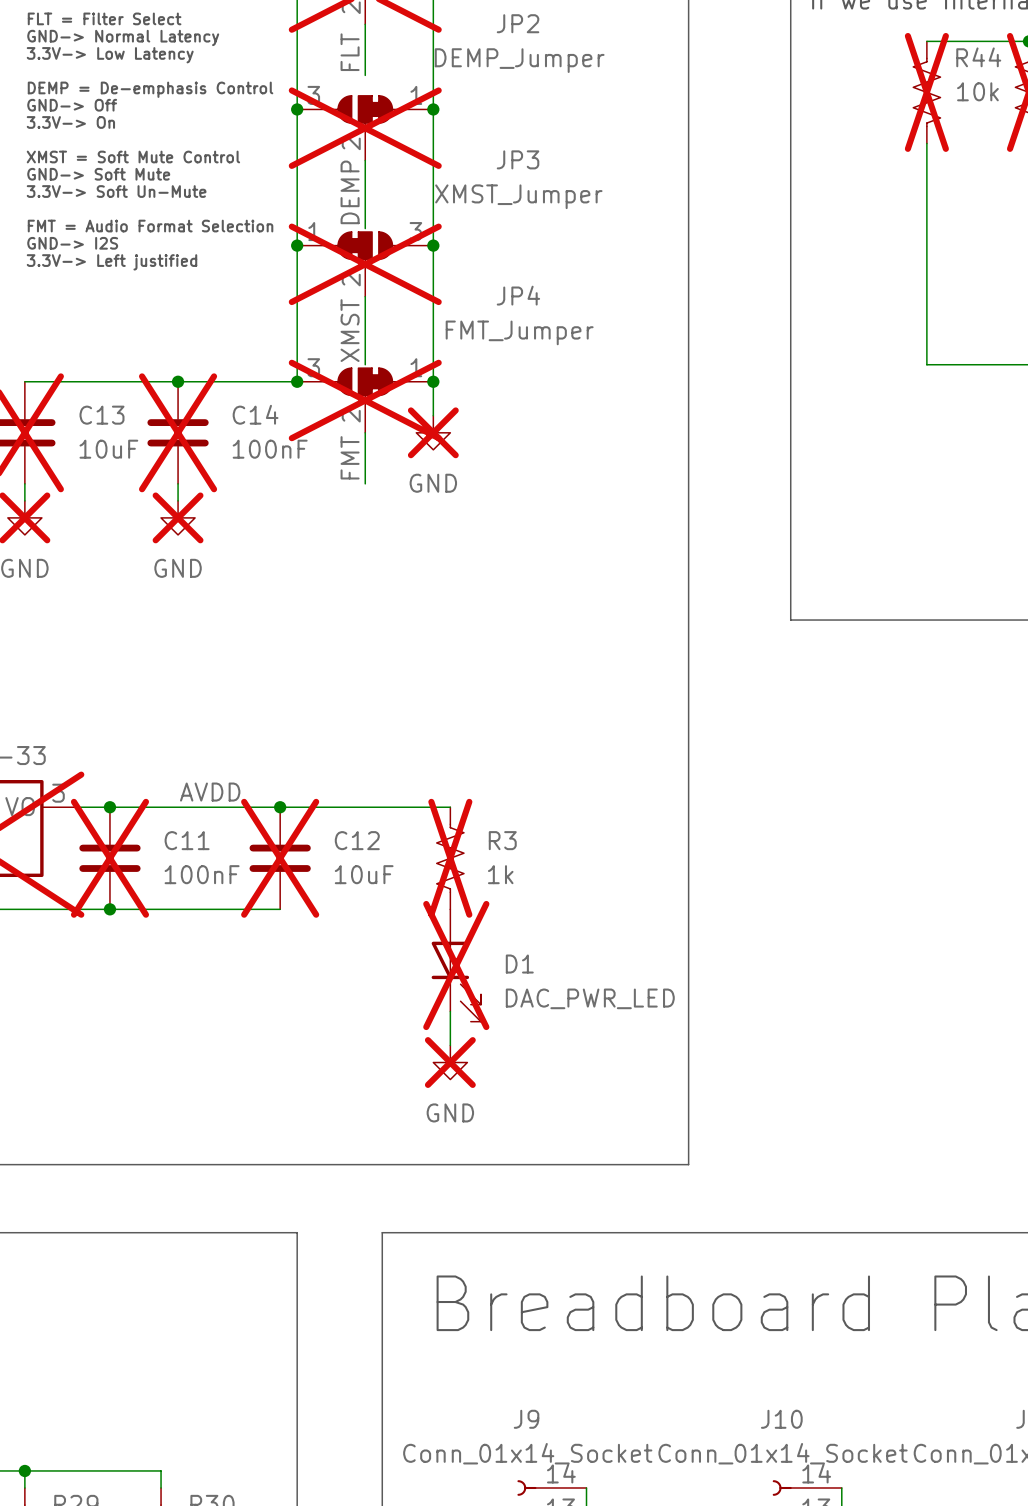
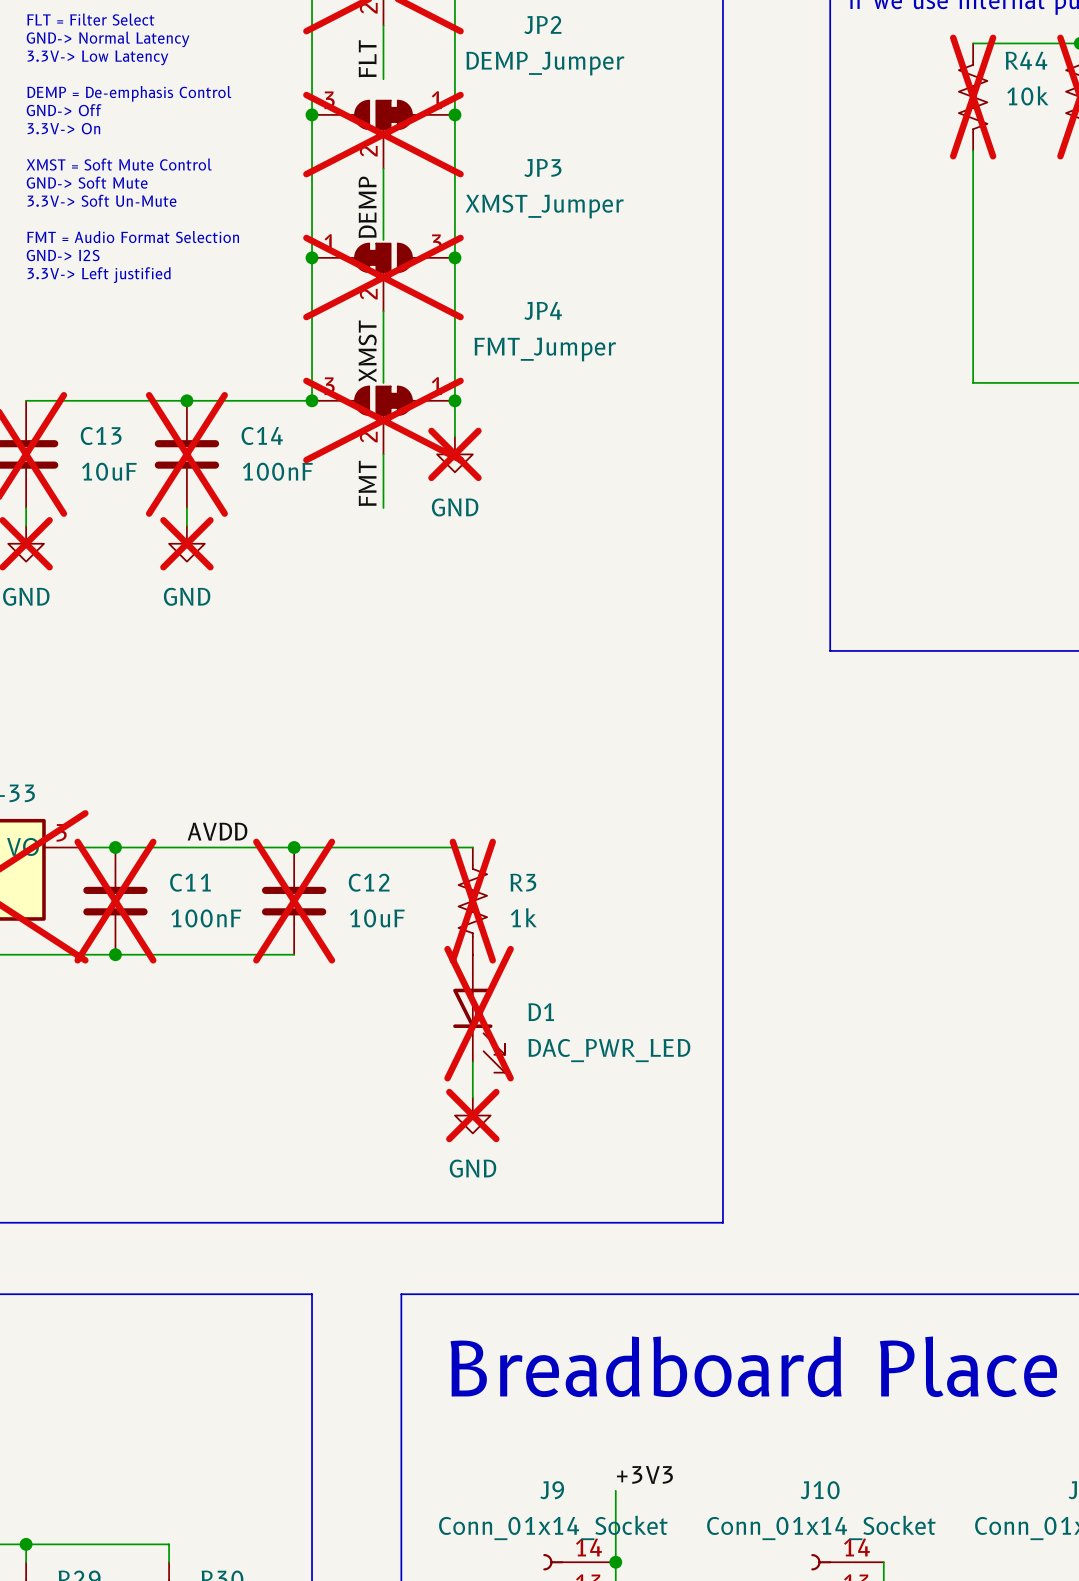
label: none -> +3V3 (644, 1474)
wire: none -> (615, 1490) (615, 1562)
junction: none -> (615, 1562)

